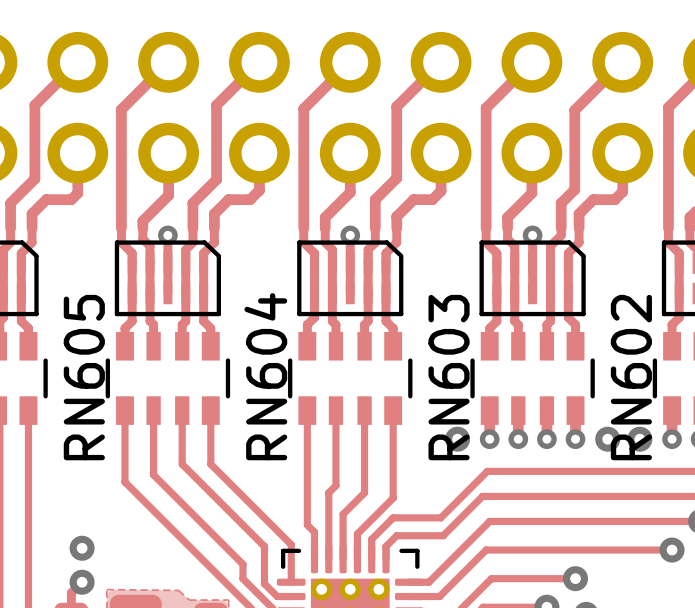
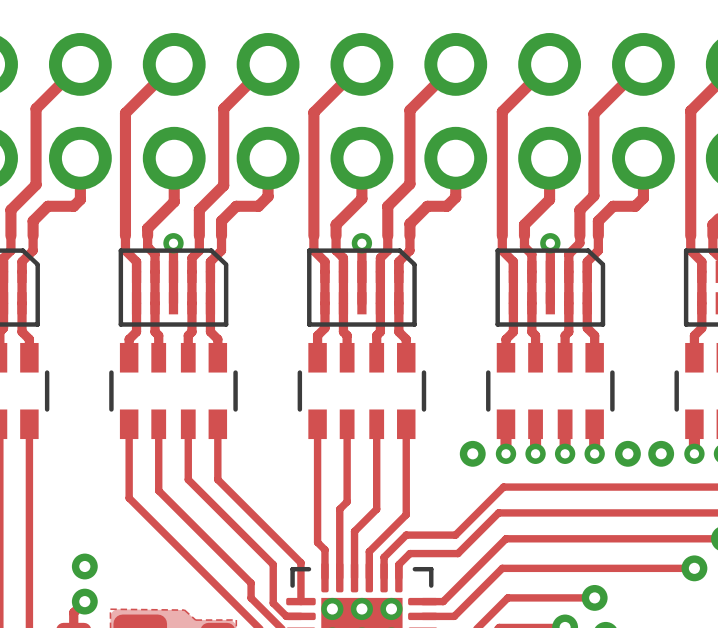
RN604 name: RN604 (265, 376) -> none
RN605 name: RN605 (84, 377) -> none
RN603 name: RN603 (449, 377) -> none
RN602 name: RN602 (631, 377) -> none

